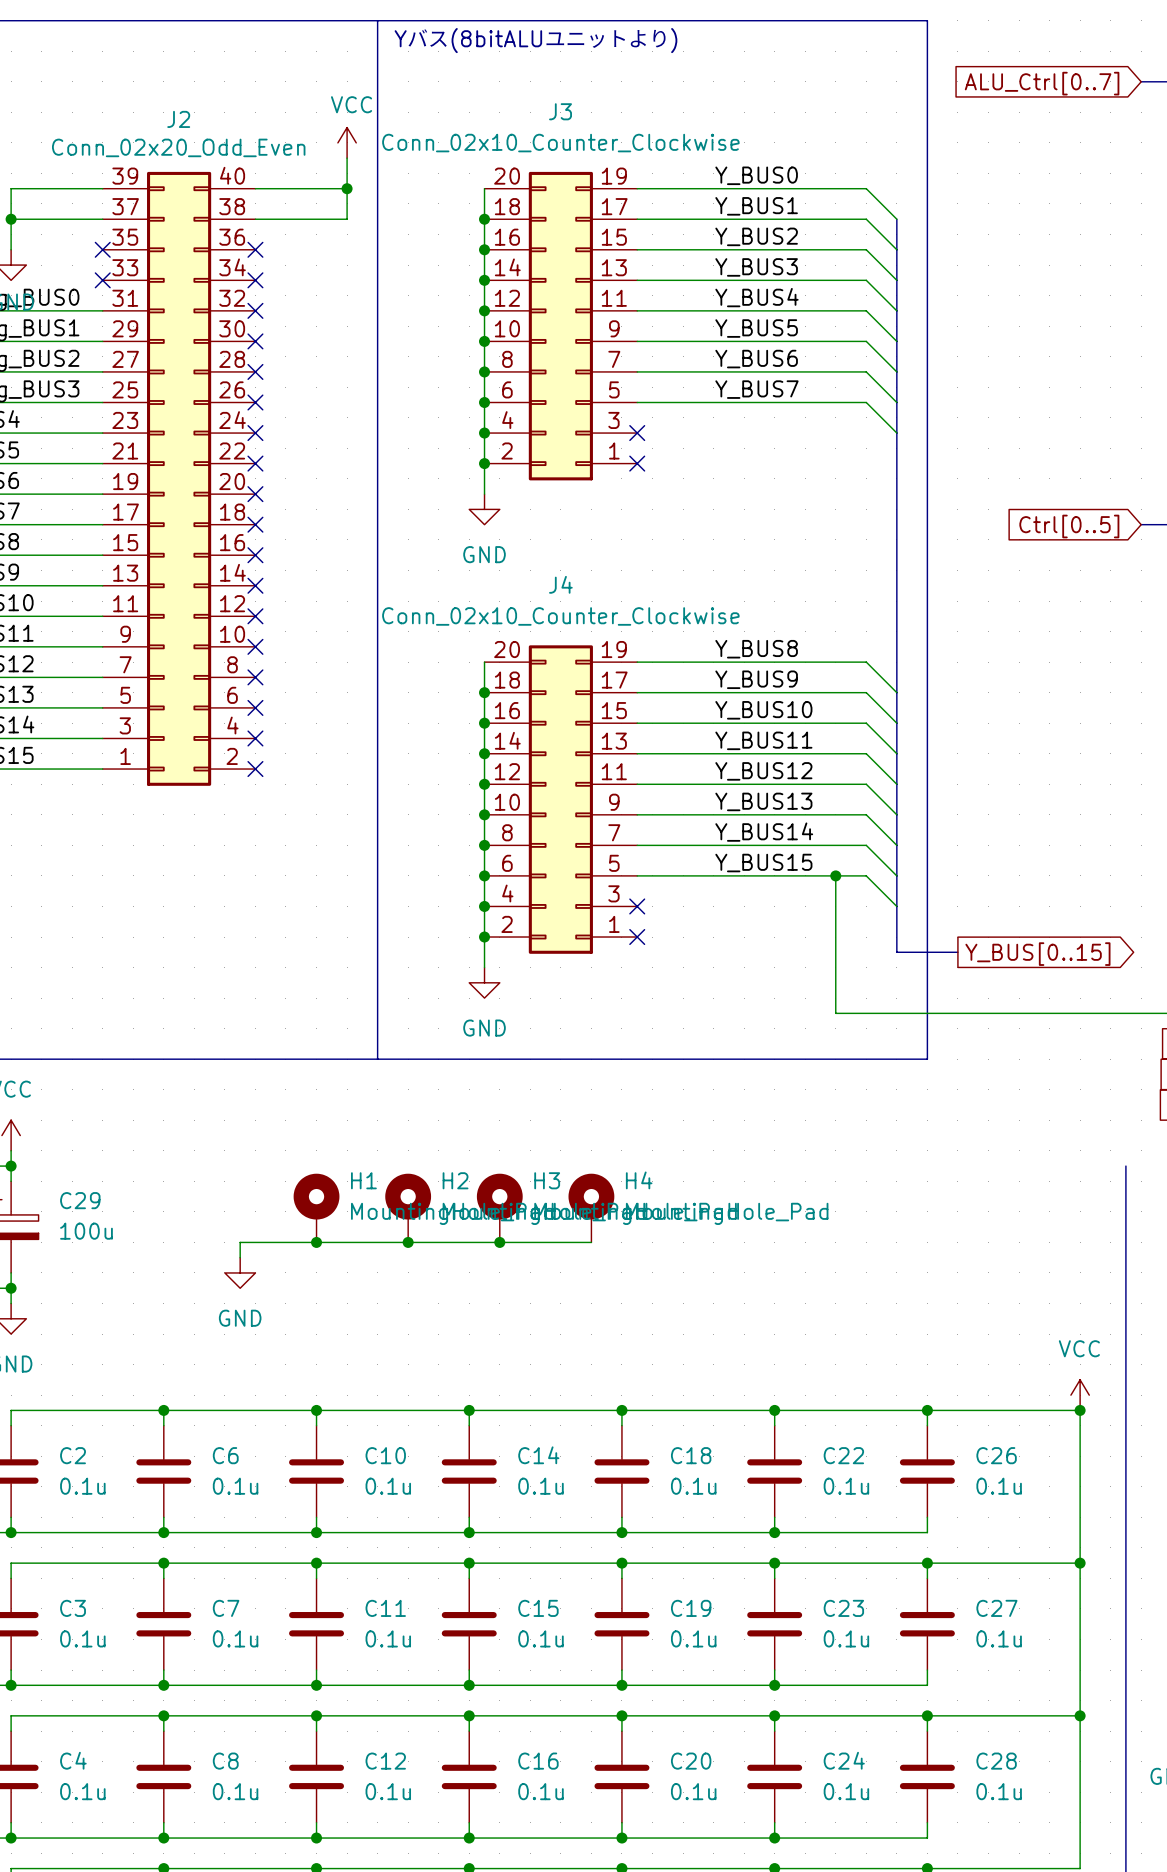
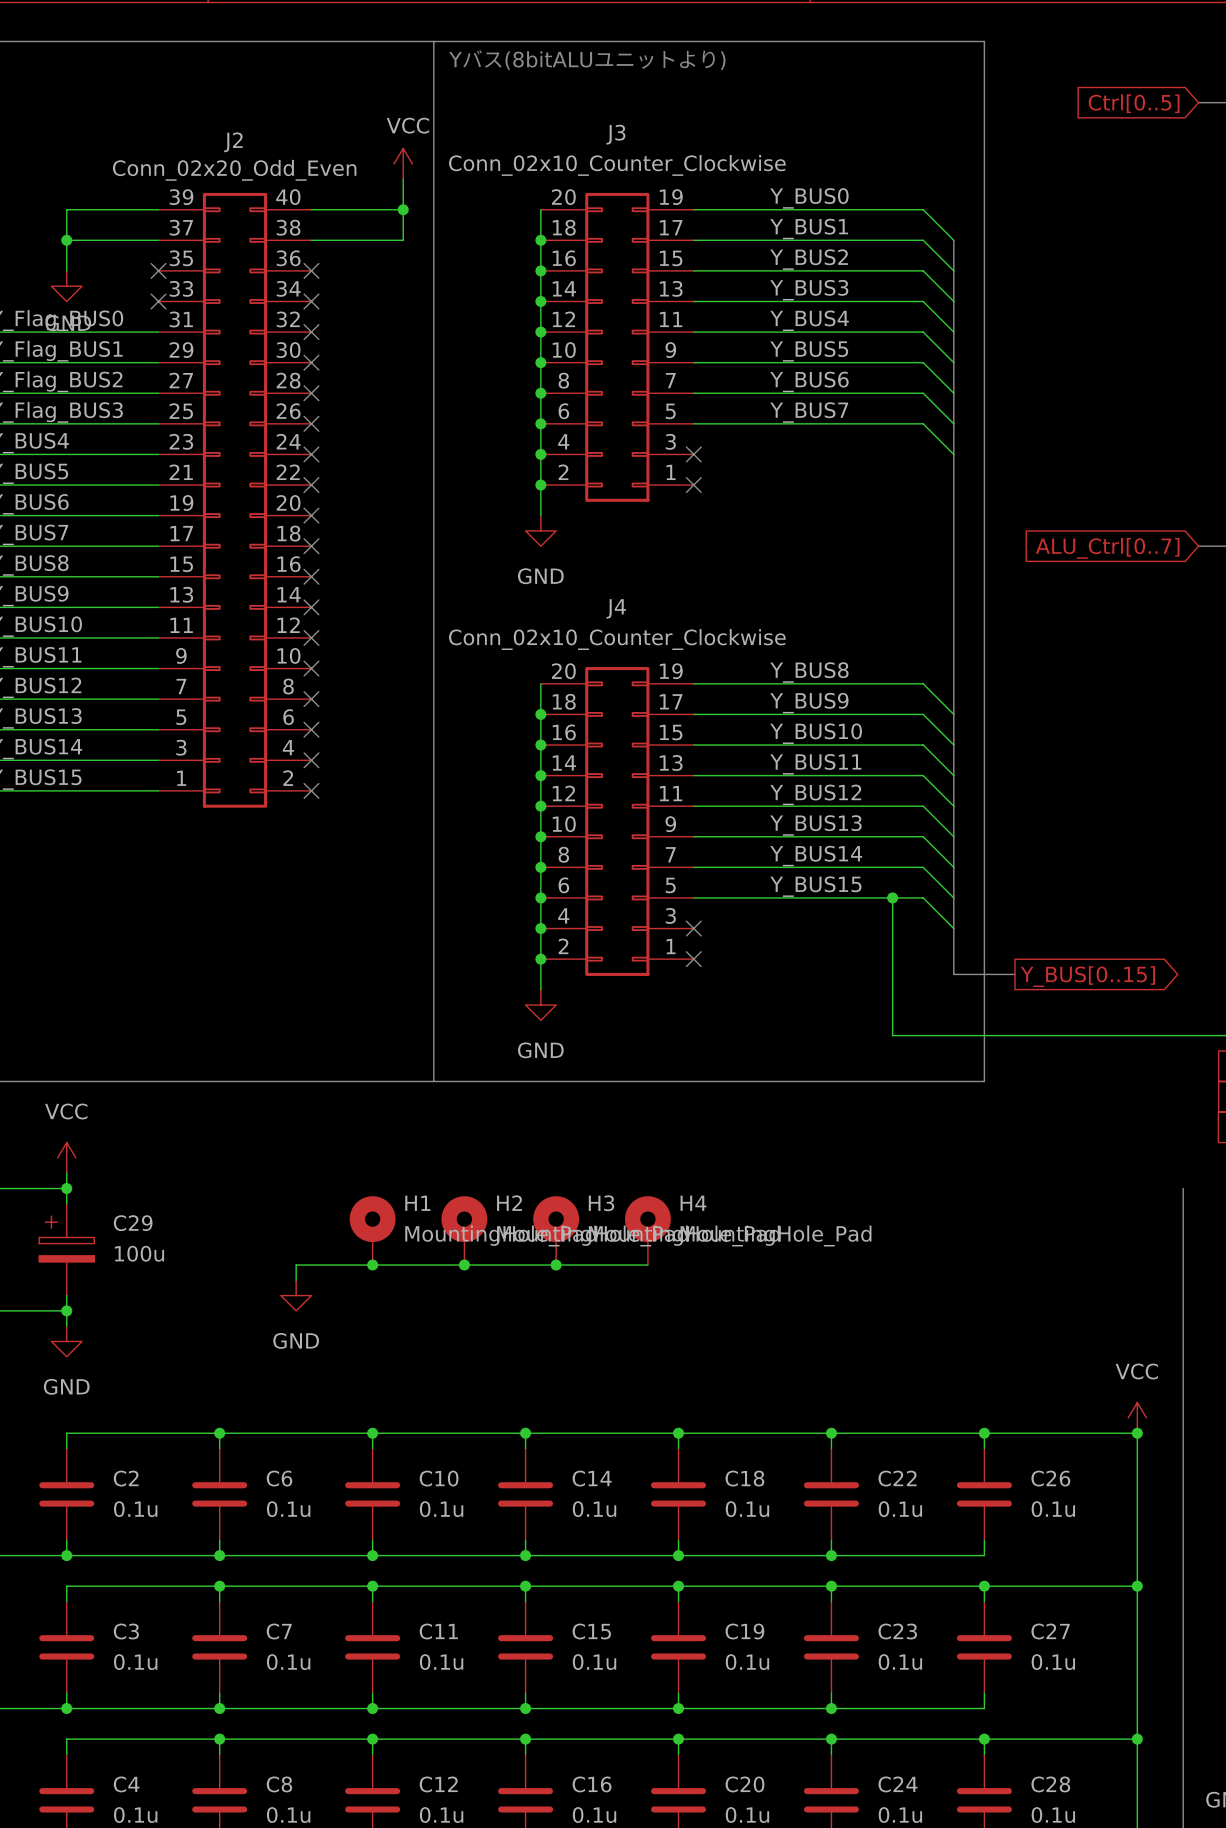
global label: ALU_Ctrl[0..7] (1042, 83) -> Ctrl[0..5] (1134, 103)
global label: Ctrl[0..5] (1069, 526) -> ALU_Ctrl[0..7] (1107, 548)

